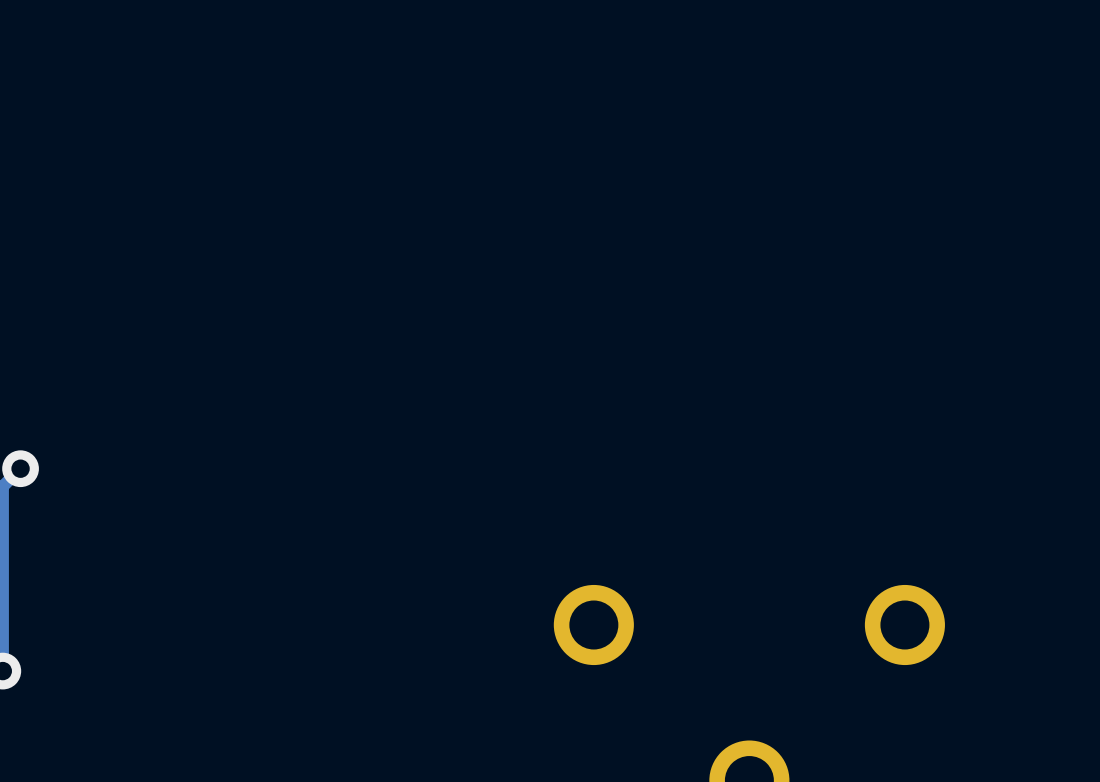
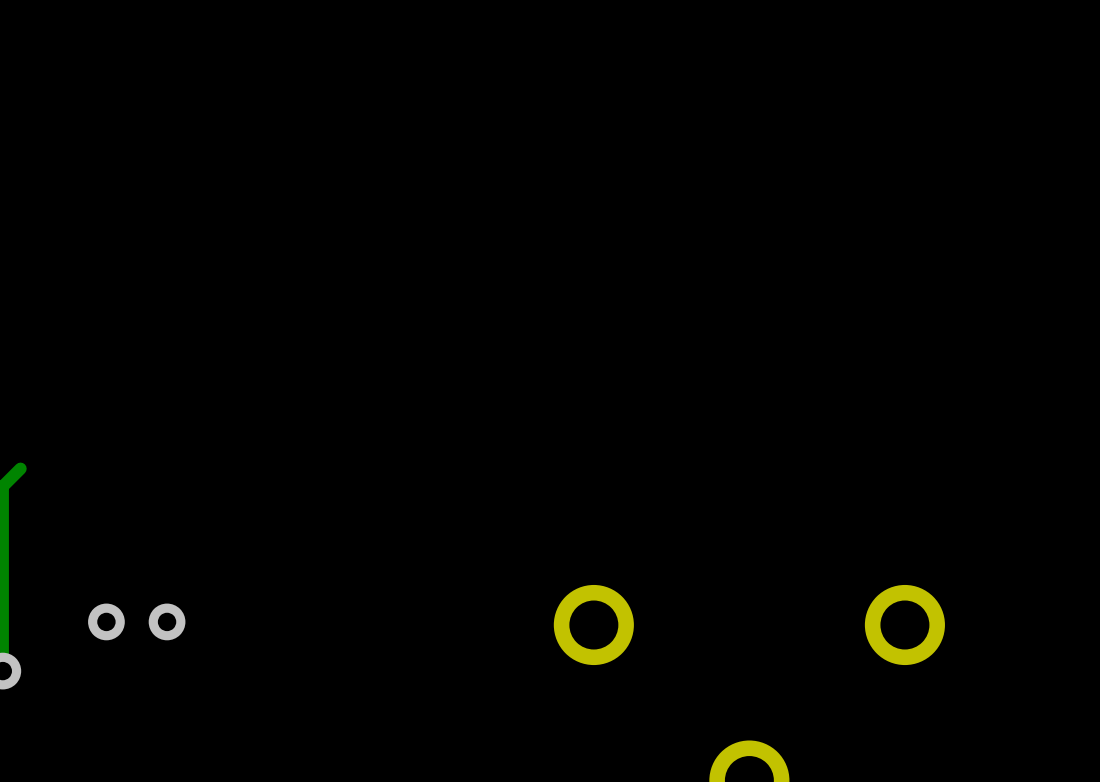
via: (20, 468) -> none
via: none -> (106, 621)
via: none -> (167, 621)

